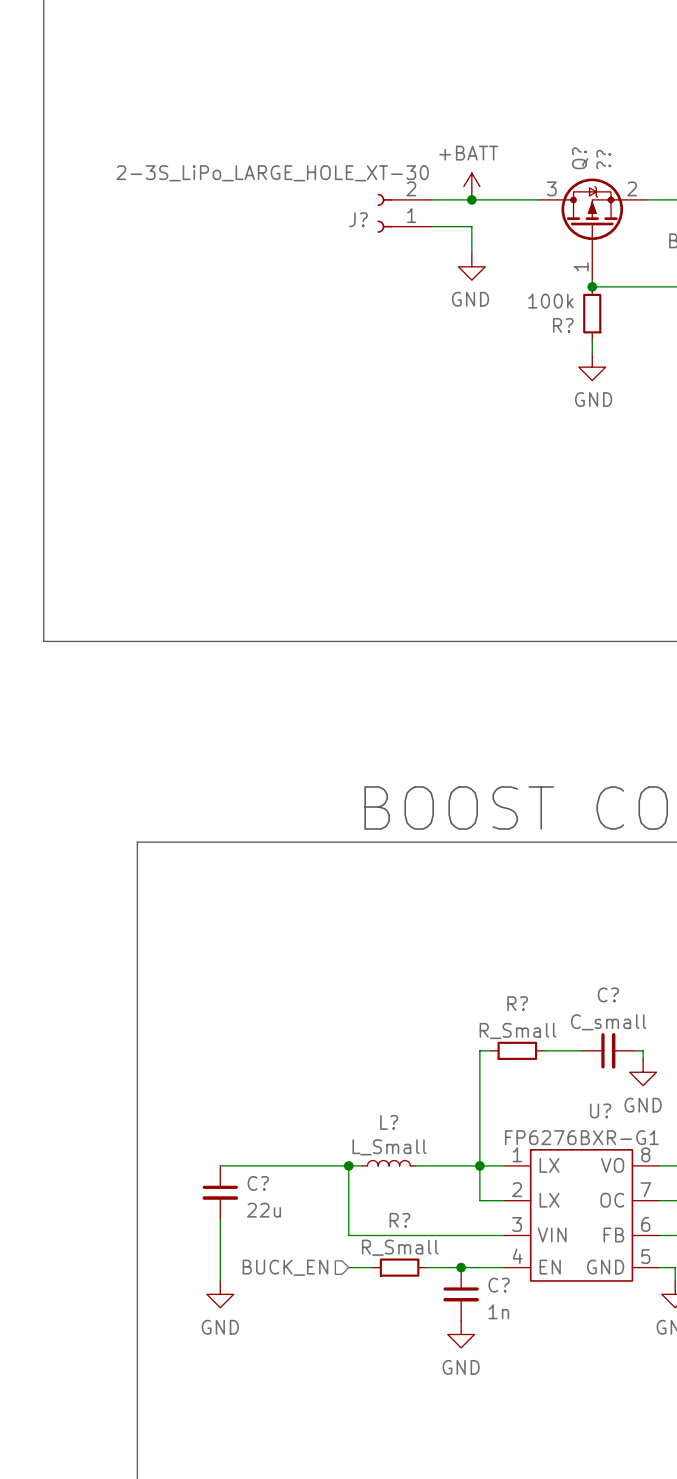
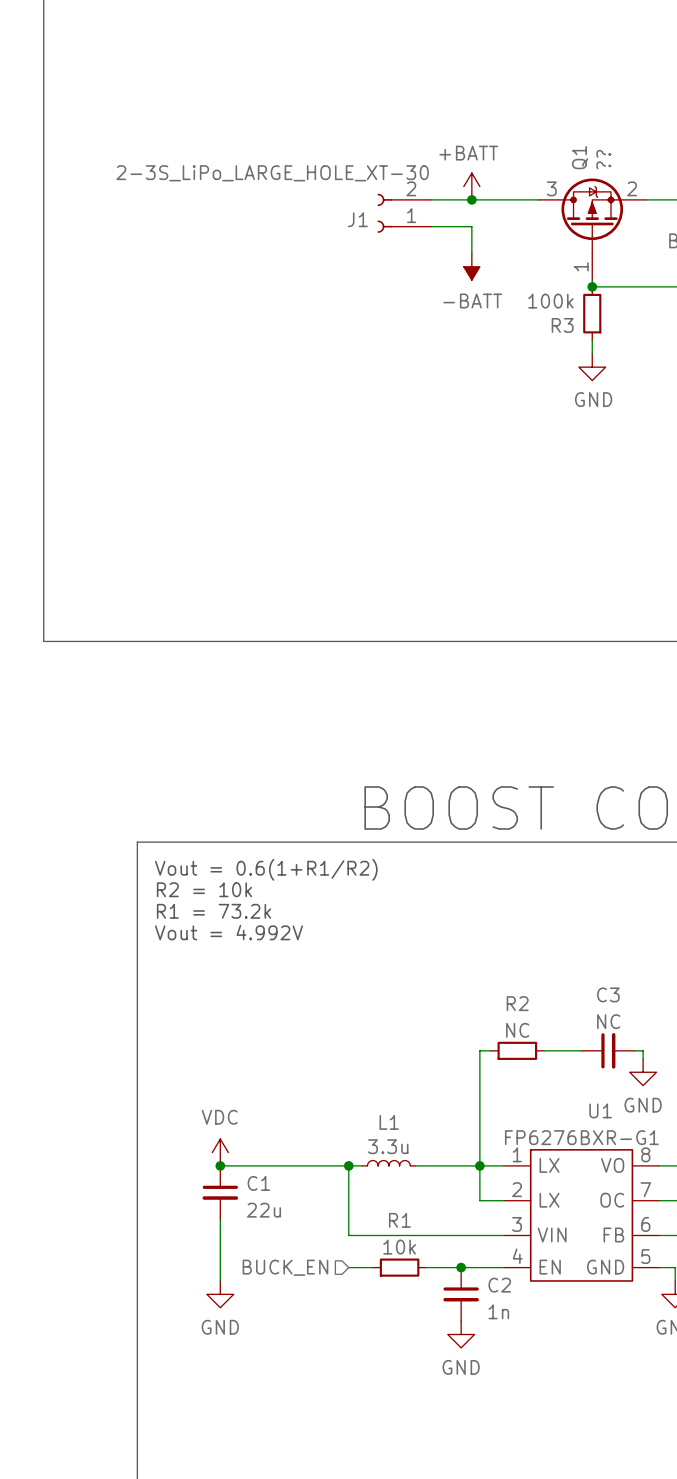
Q? name: Q? (580, 158) -> Q1 (580, 157)
J? name: J? (358, 219) -> J1 (357, 219)
power symbol: GND (471, 266) -> -BATT (471, 266)
R? name: R? (563, 325) -> R3 (562, 325)
text: none -> Vout = 0.6(1+R1/R2) (266, 869)
text: none -> R2 = 10k (204, 889)
text: none -> R1 = 73.2k (214, 911)
text: none -> Vout = 4.992V (229, 932)
C? name: C? (608, 994) -> C3 (608, 994)
R? name: R? (517, 1003) -> R2 (517, 1003)
C? value: C_small (608, 1022) -> NC (608, 1021)
R? value: R_Small (517, 1030) -> NC (517, 1030)
U? name: U? (600, 1110) -> U1 (600, 1110)
L? name: L? (389, 1122) -> L1 (389, 1122)
L? value: L_Small (389, 1147) -> 3.3u (388, 1146)
power symbol: none -> VDC (220, 1152)
junction: none -> (220, 1165)
C? name: C? (258, 1183) -> C1 (258, 1183)
R? name: R? (399, 1220) -> R1 (399, 1220)
R? value: R_Small (400, 1247) -> 10k (399, 1247)
C? name: C? (499, 1285) -> C2 (499, 1285)

